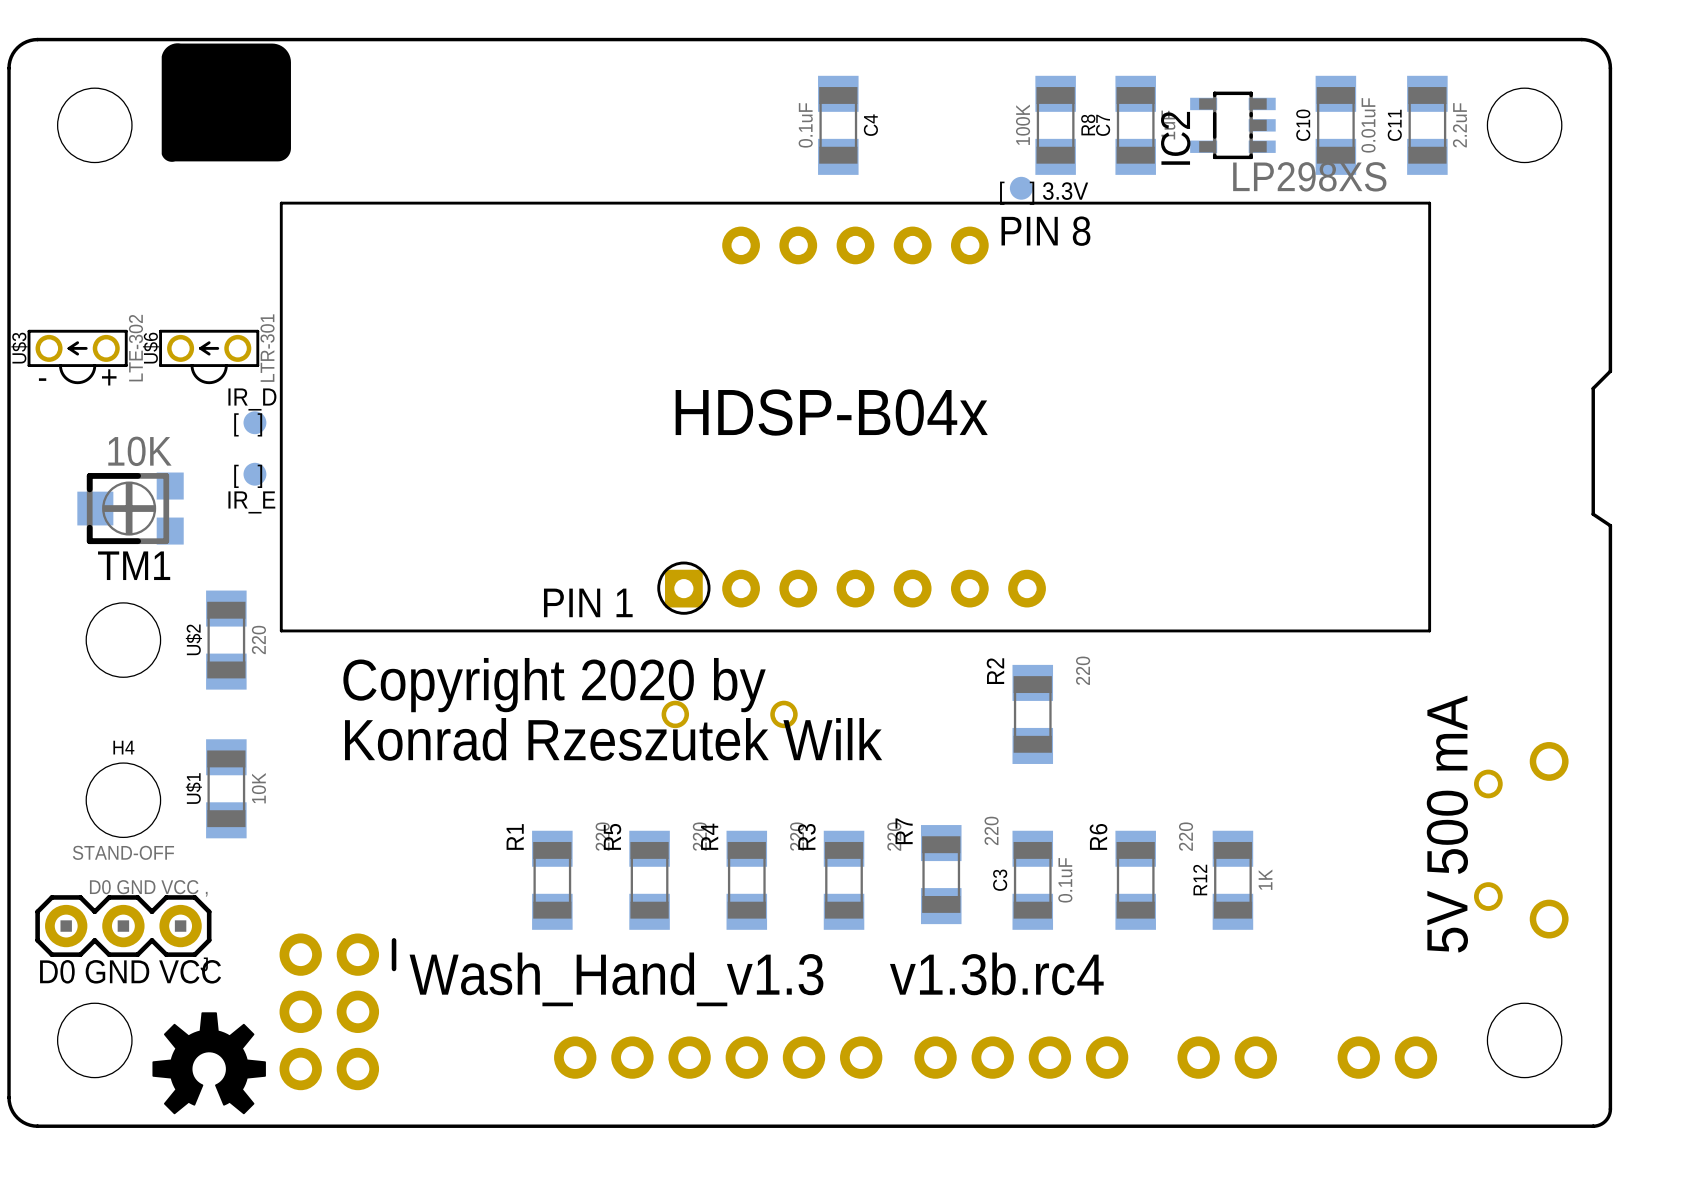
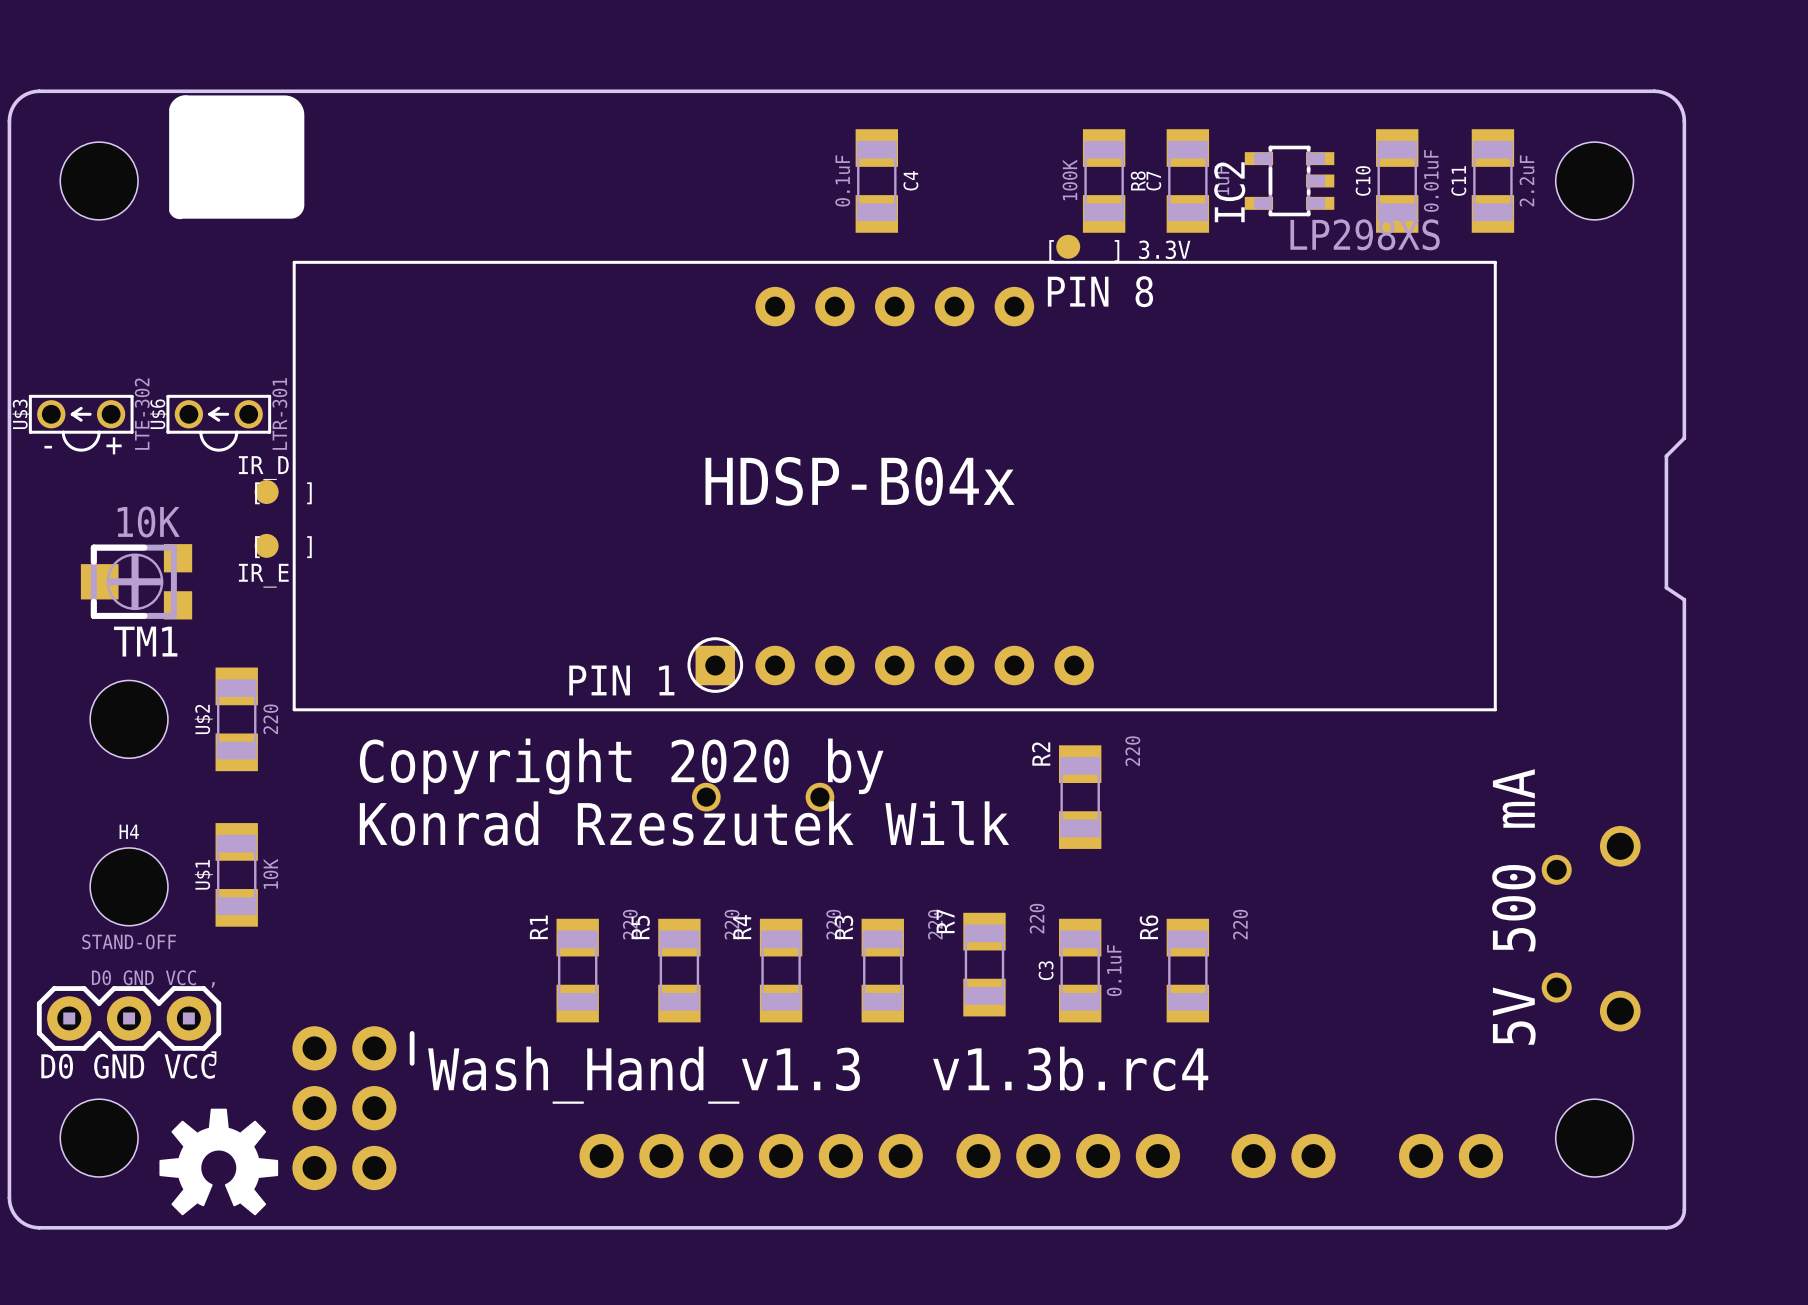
R12: 1K (1232, 880) -> none

